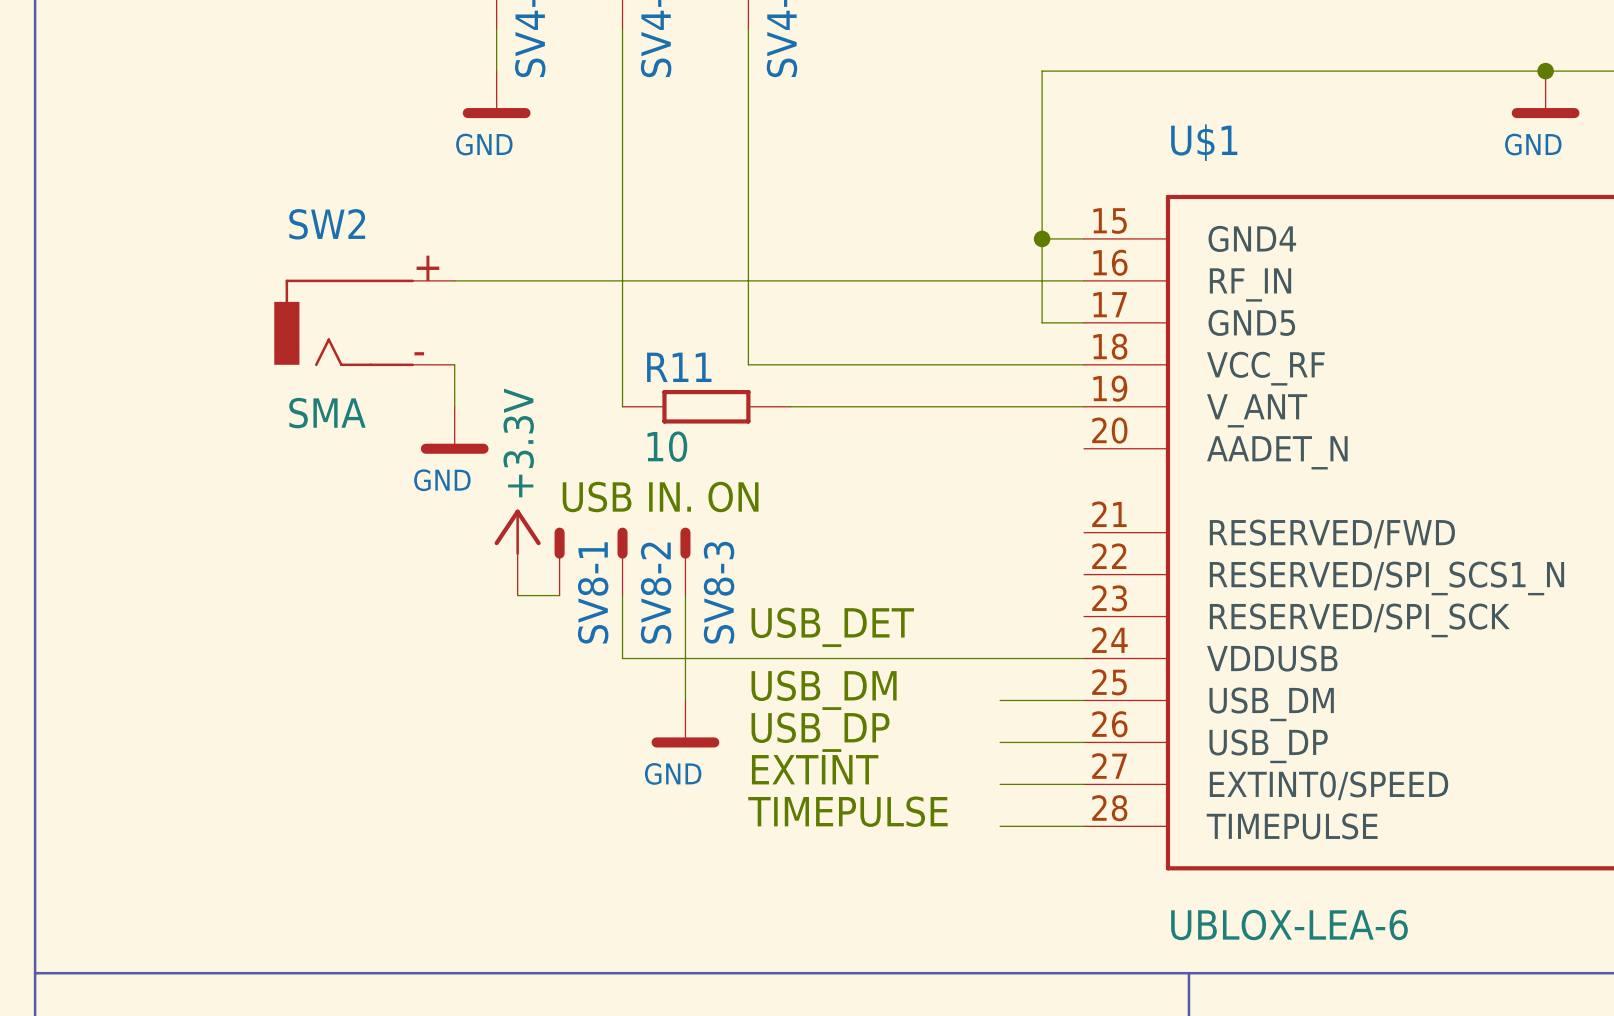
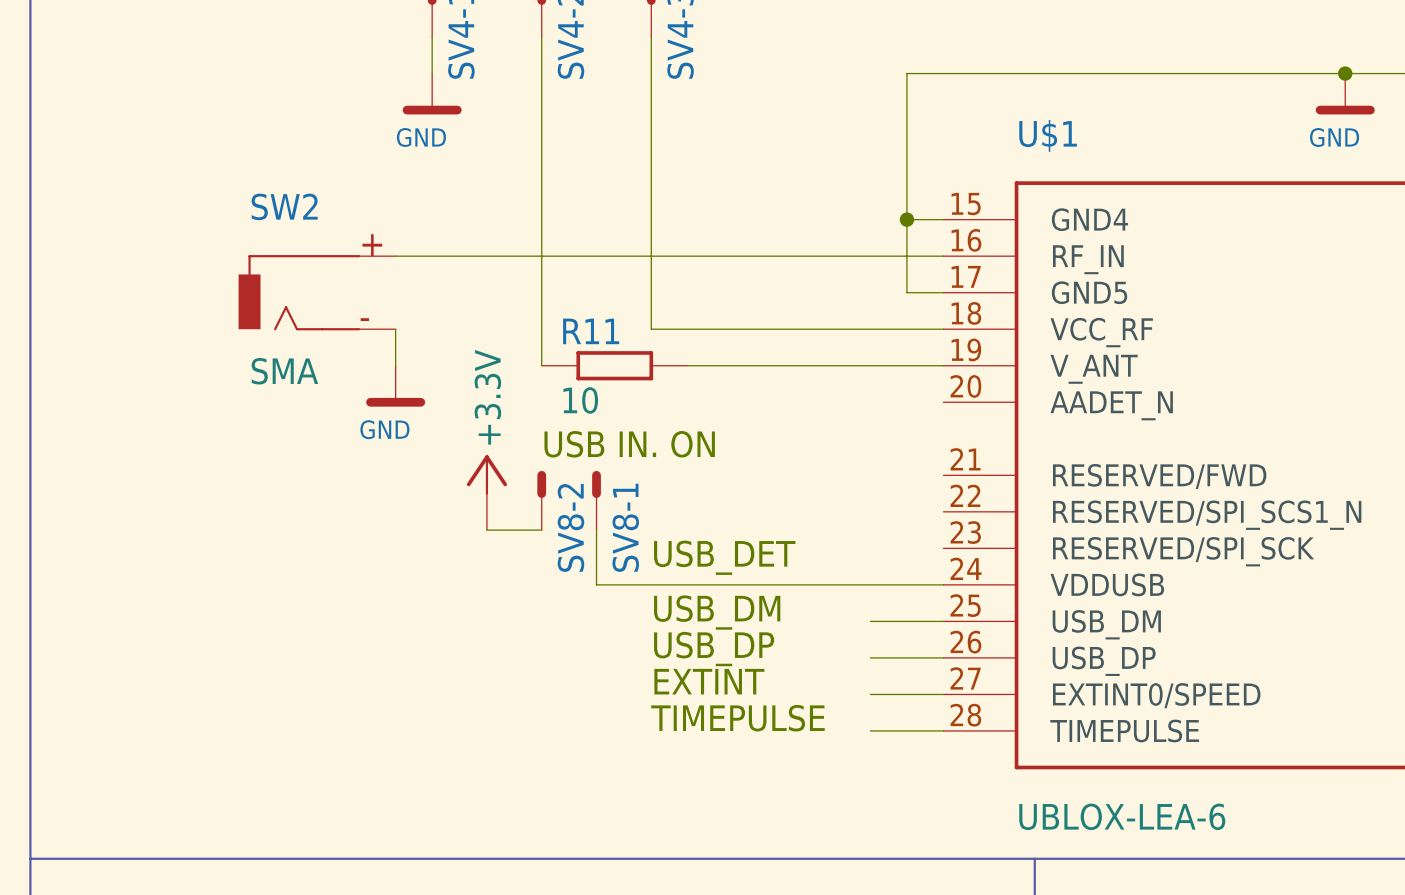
text position: USB IN. ON (660, 497) -> USB IN. ON (629, 444)
power symbol position: +3.3V (517, 552) -> +3.3V (486, 492)
SV8-1: (559, 561) -> none
SV8-3 name: SV8-3 (719, 592) -> SV8-1 (625, 527)
wire: (517, 595) (559, 595) -> (541, 530) (486, 530)
wire: (622, 595) (622, 658) (685, 658) (685, 700) -> none
power symbol: (685, 723) -> none

